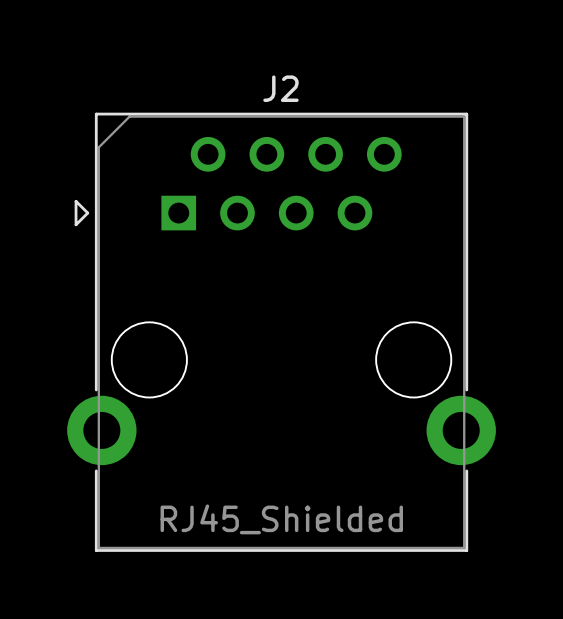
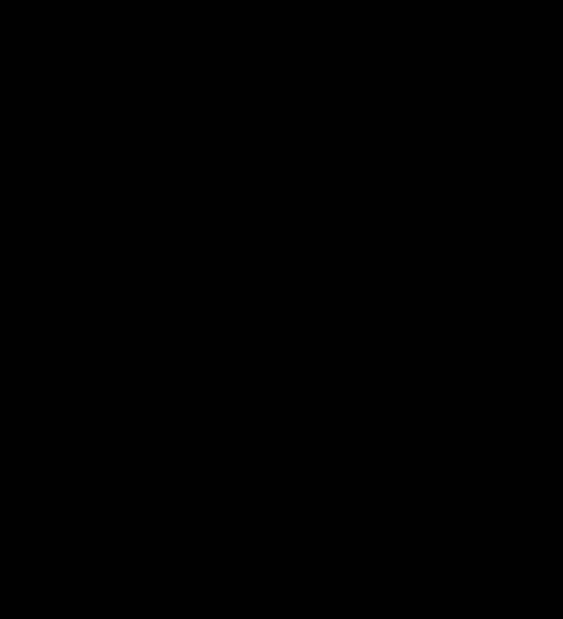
J2: RJ45_Shielded (281, 332) -> none

